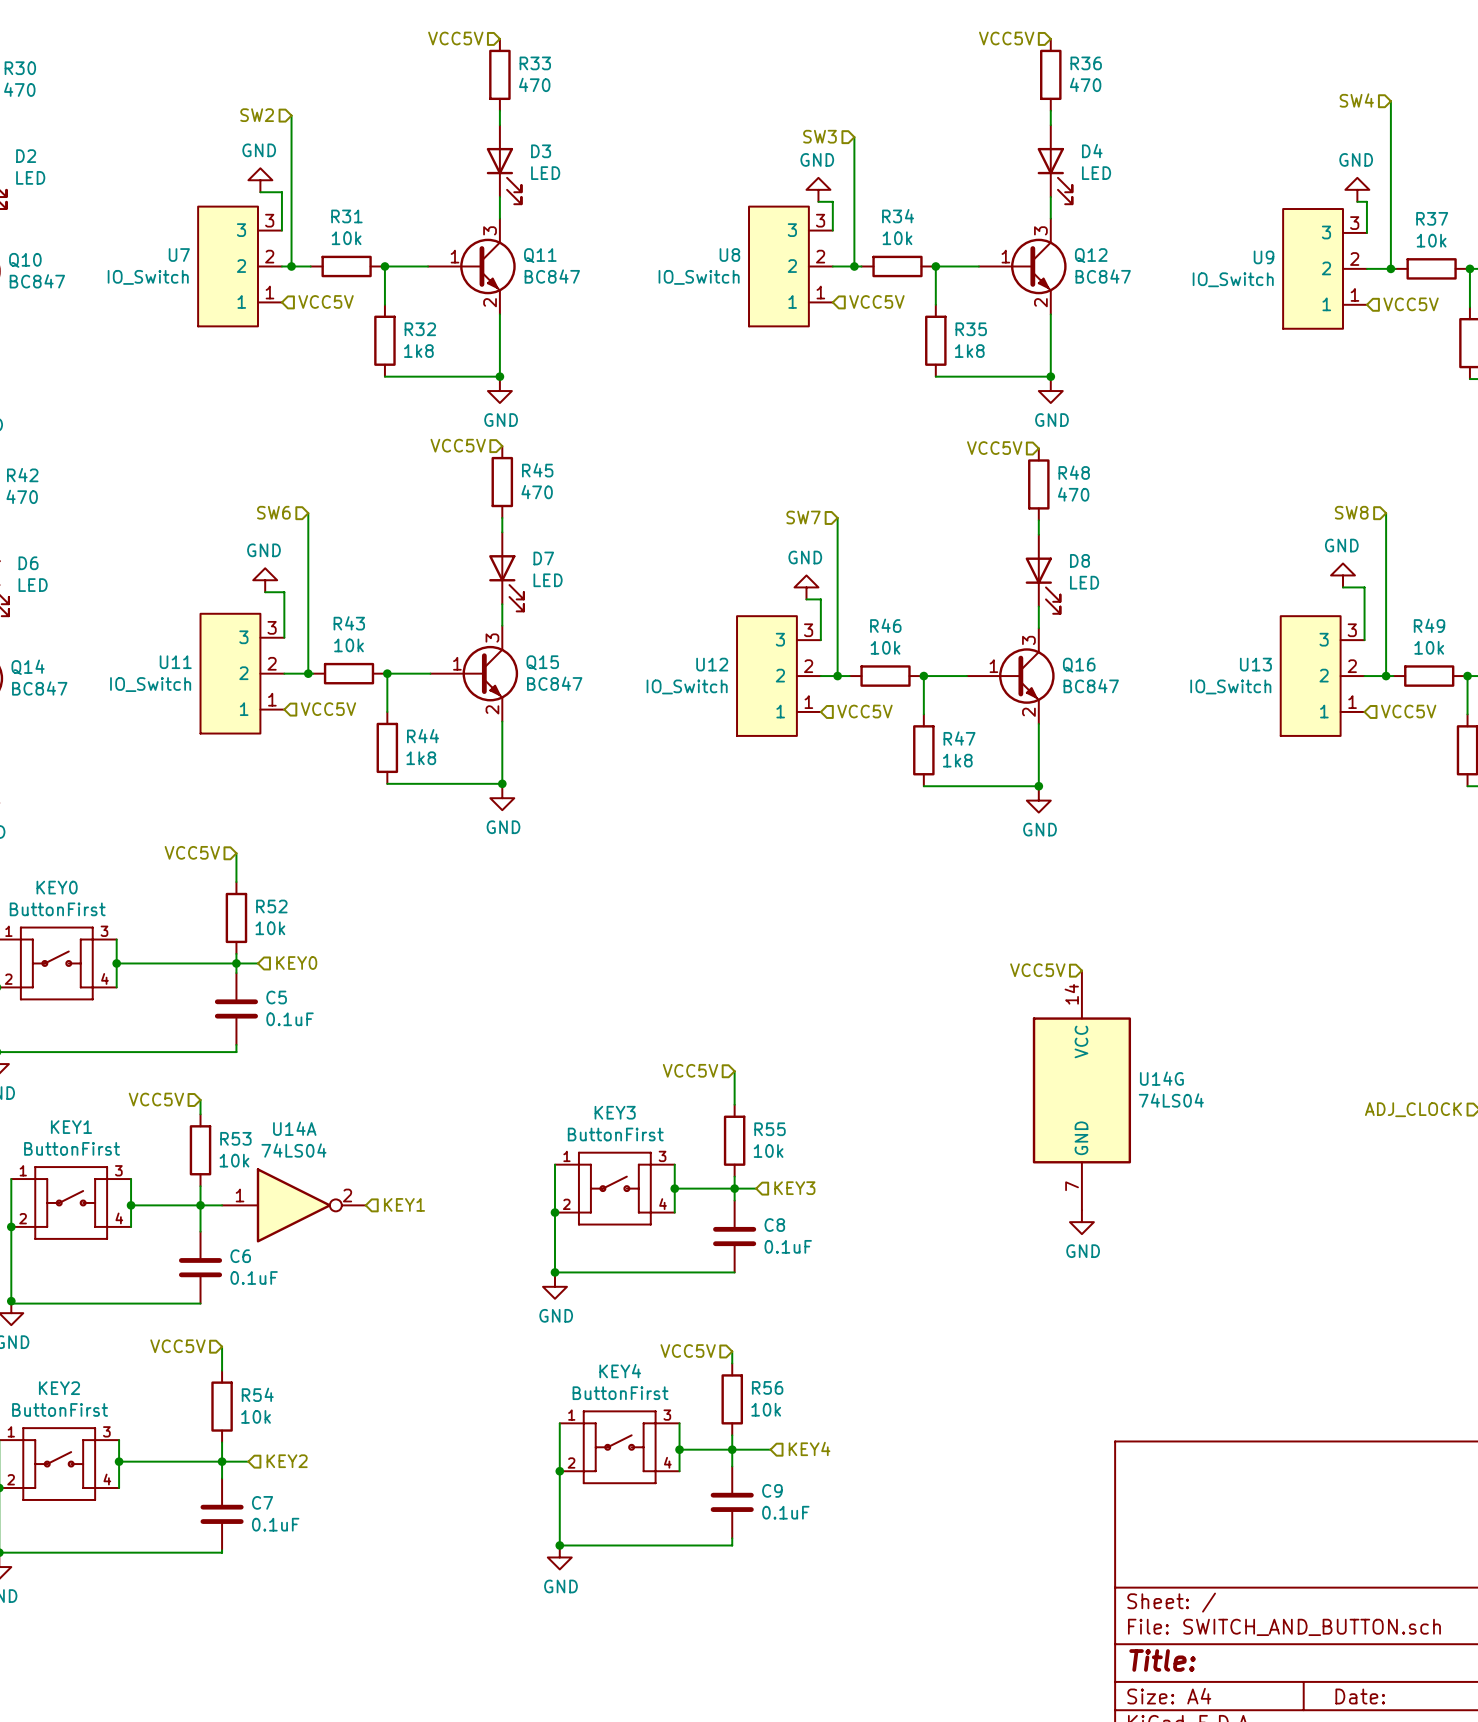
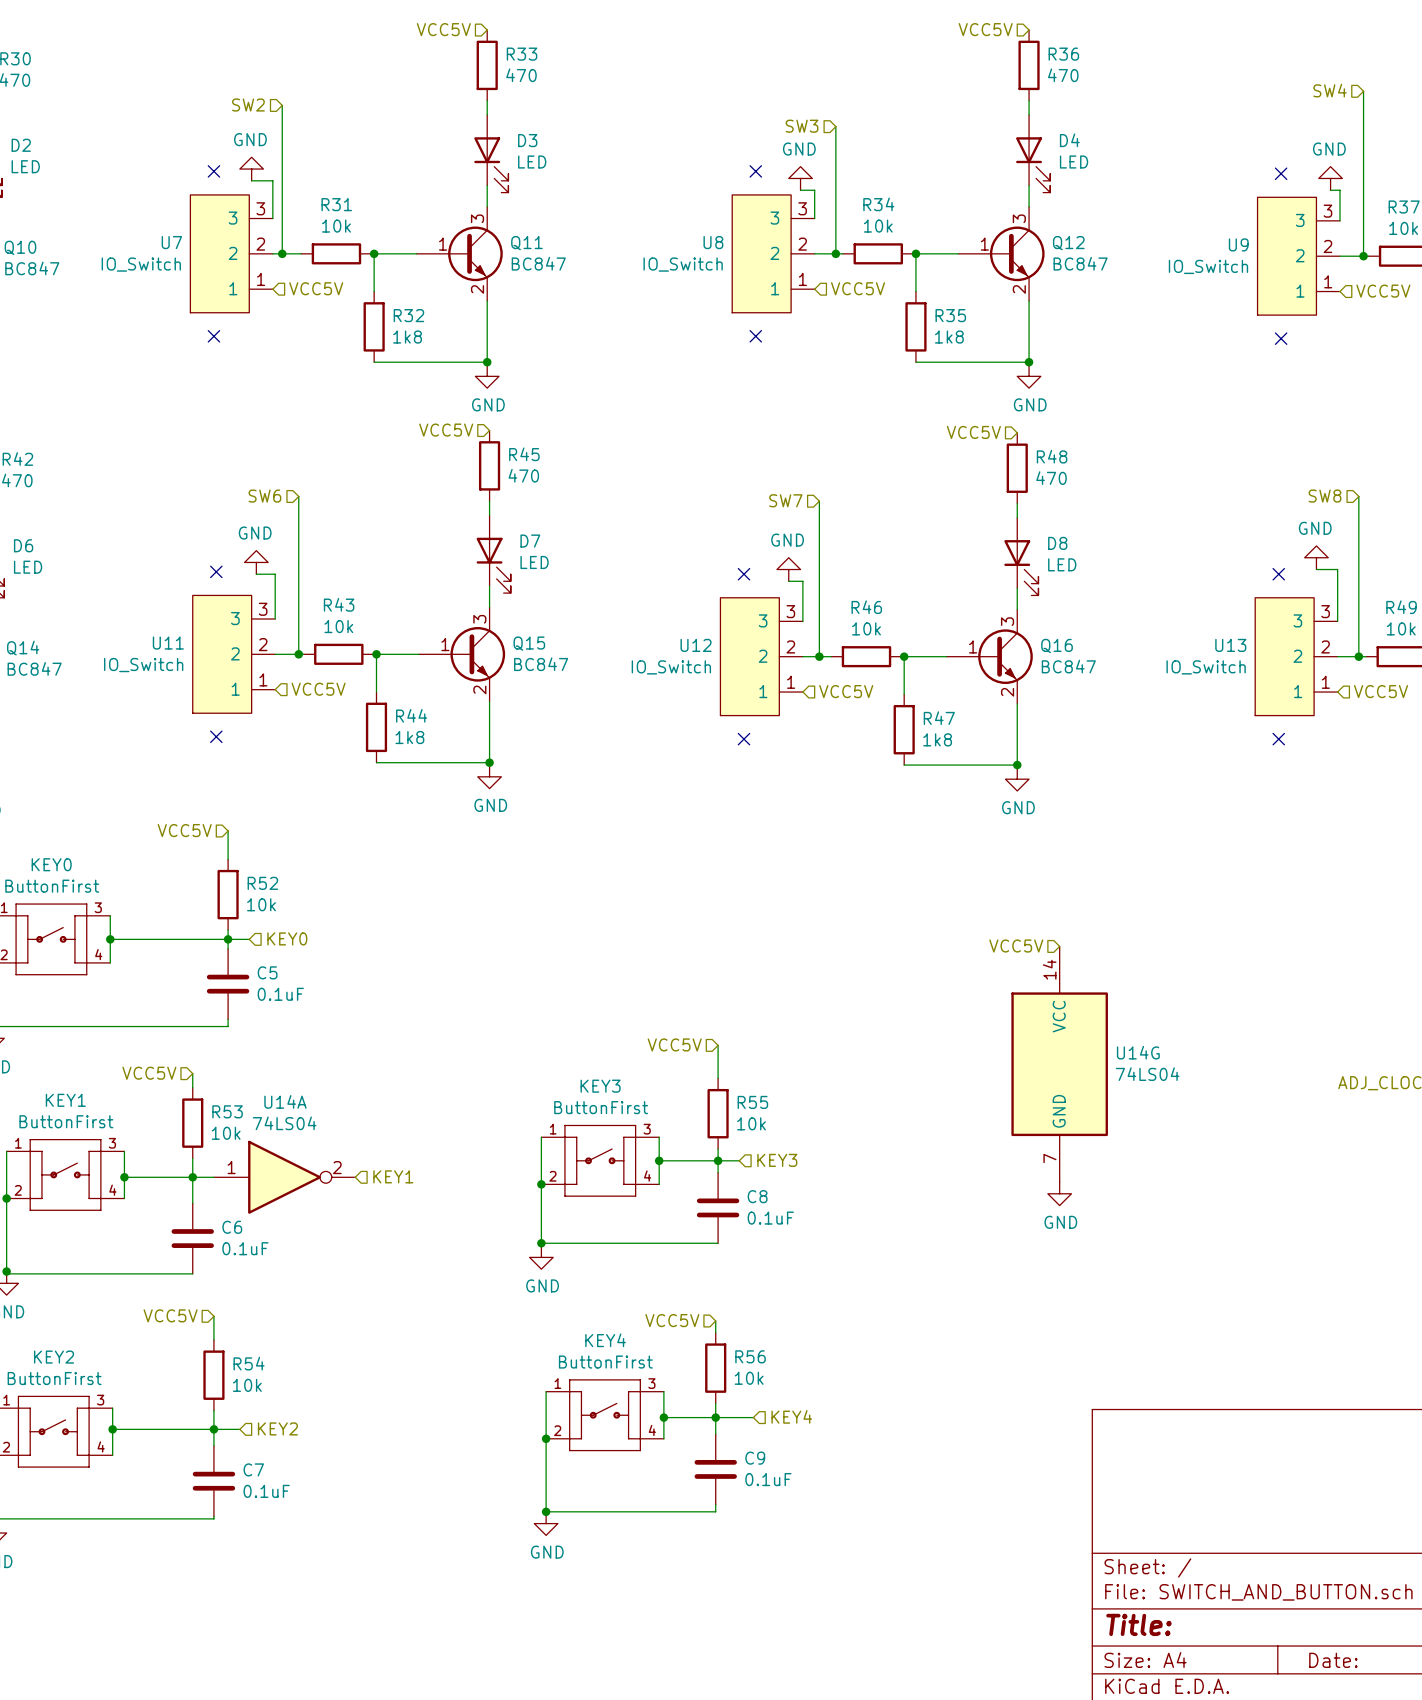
no-connect mark: none -> (213, 171)
no-connect mark: none -> (755, 171)
no-connect mark: none -> (1281, 173)
no-connect mark: none -> (213, 336)
no-connect mark: none -> (755, 336)
no-connect mark: none -> (1281, 338)
no-connect mark: none -> (216, 571)
no-connect mark: none -> (743, 574)
no-connect mark: none -> (1278, 574)
no-connect mark: none -> (216, 736)
no-connect mark: none -> (743, 739)
no-connect mark: none -> (1278, 739)

